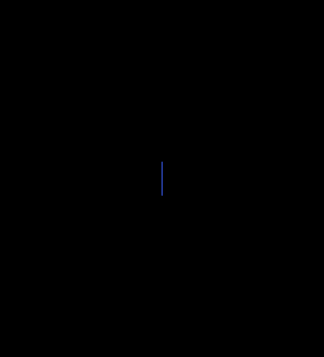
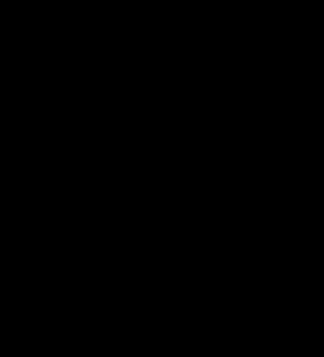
track: (162, 162) (162, 195) -> none

